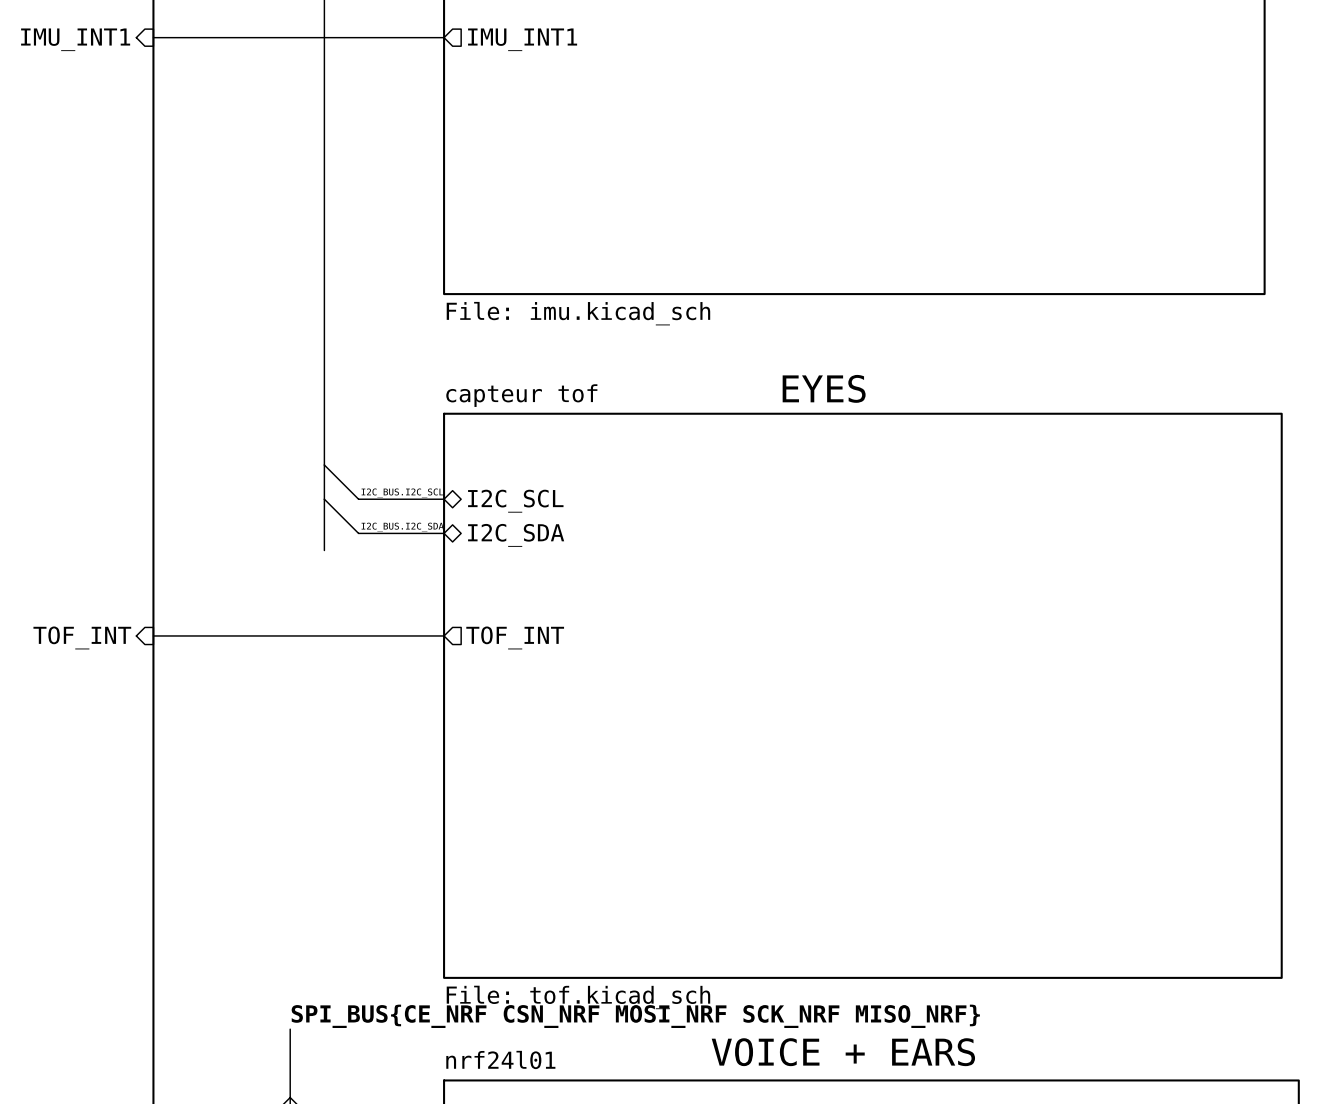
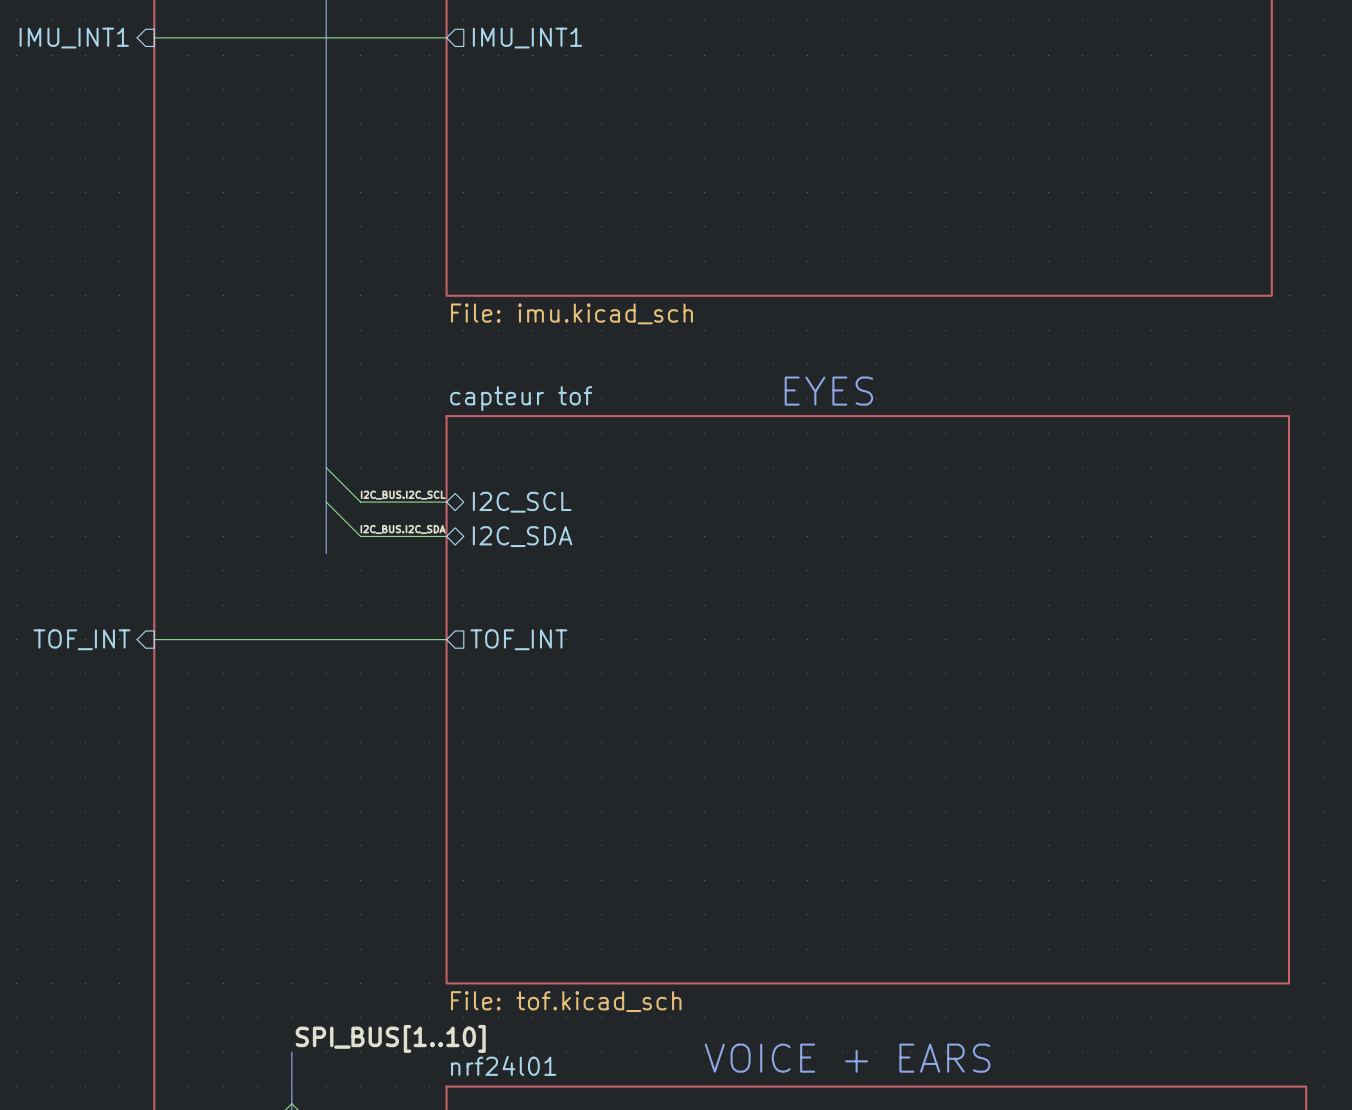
label: SPI_BUS{CE_NRF CSN_NRF MOSI_NRF SCK_NRF MISO_NRF} (635, 1016) -> none
bus: (290, 1029) (290, 1046) -> none
label: none -> SPI_BUS[1..10] (390, 1038)

